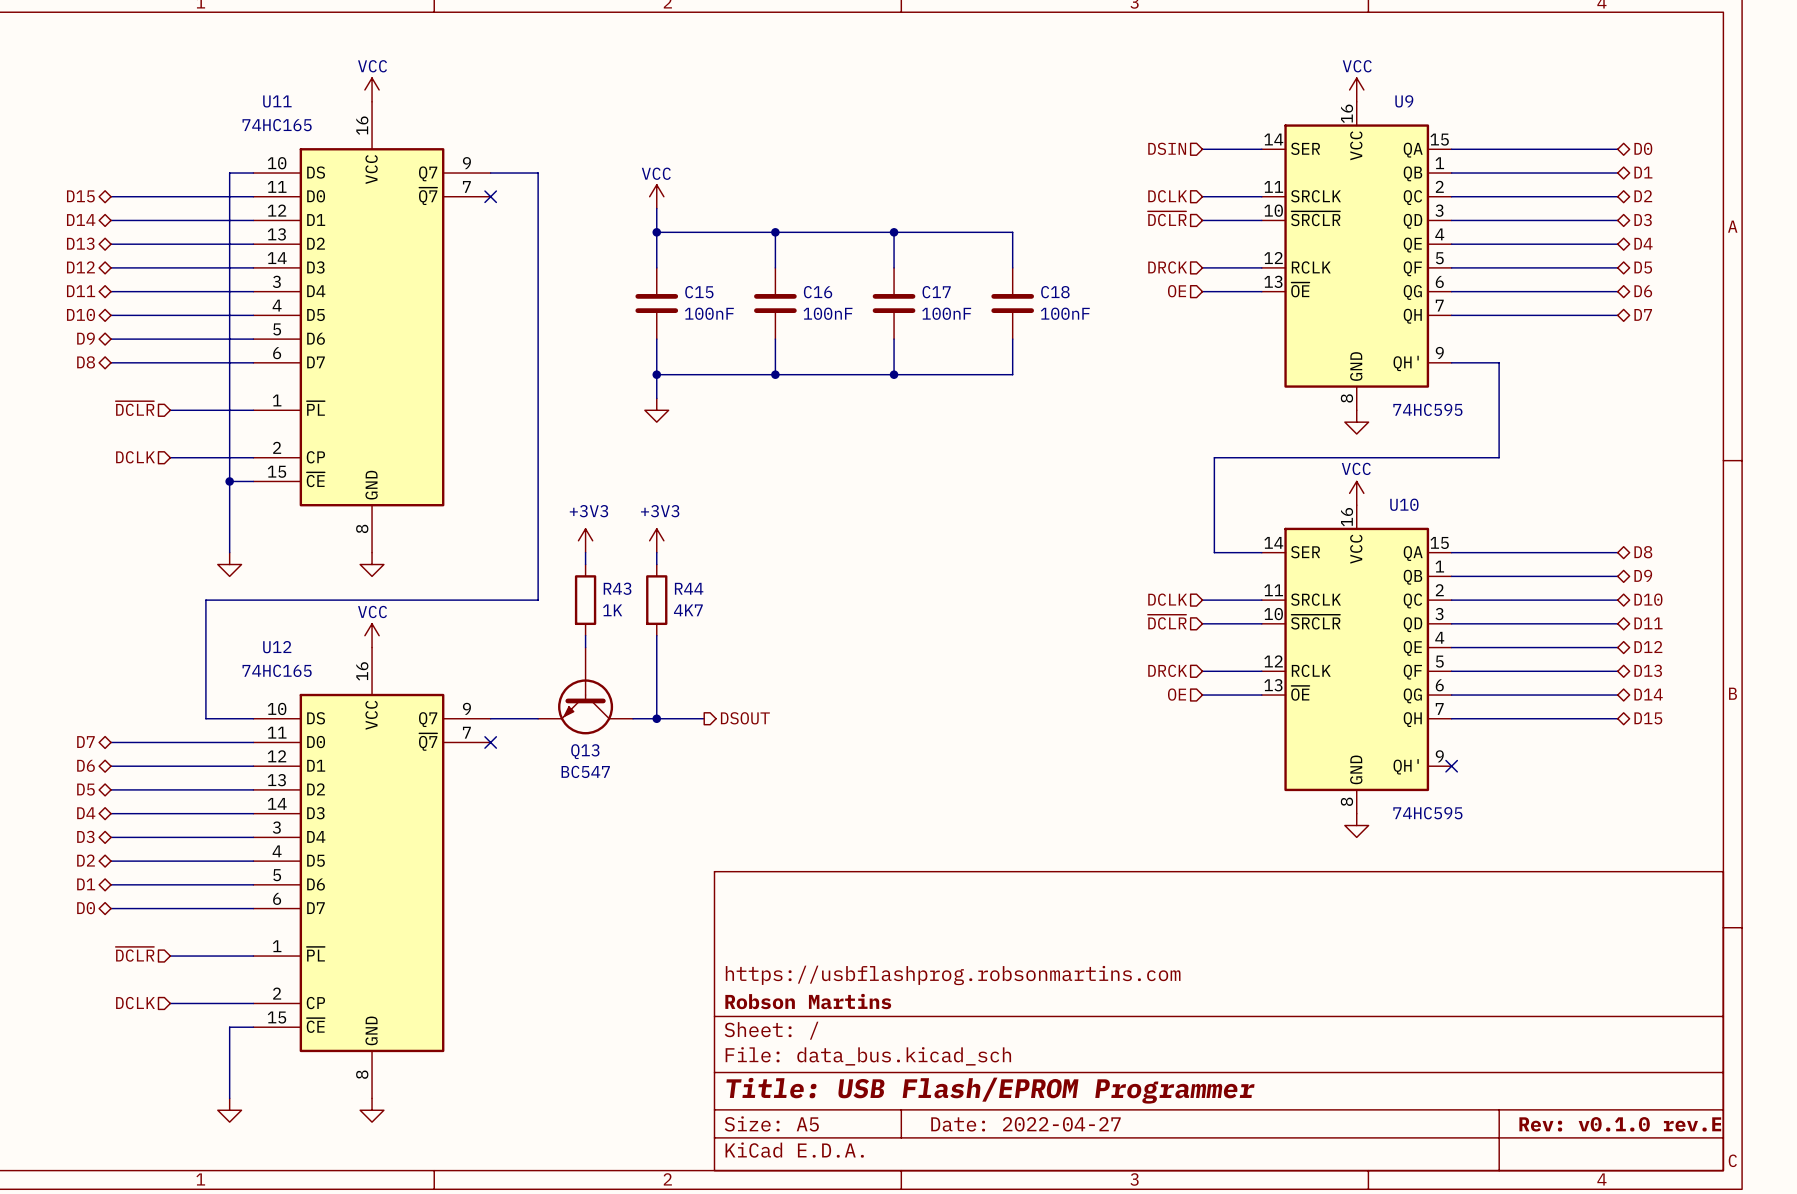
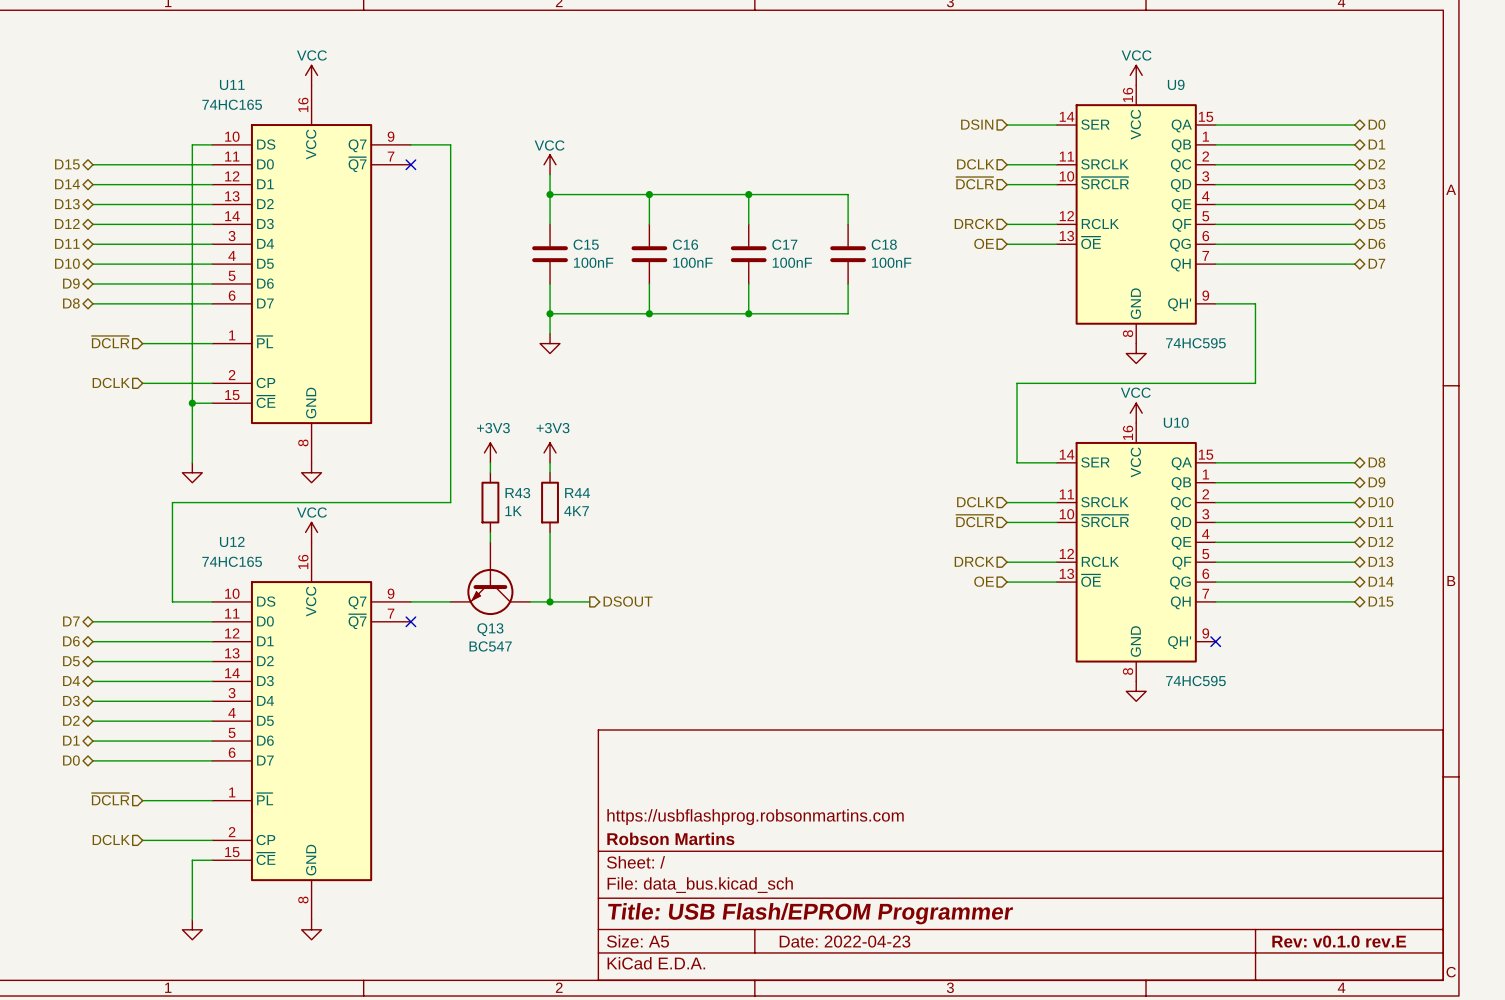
title block: Date: 2022-04-27 (1025, 1124) -> Date: 2022-04-23 (845, 941)

